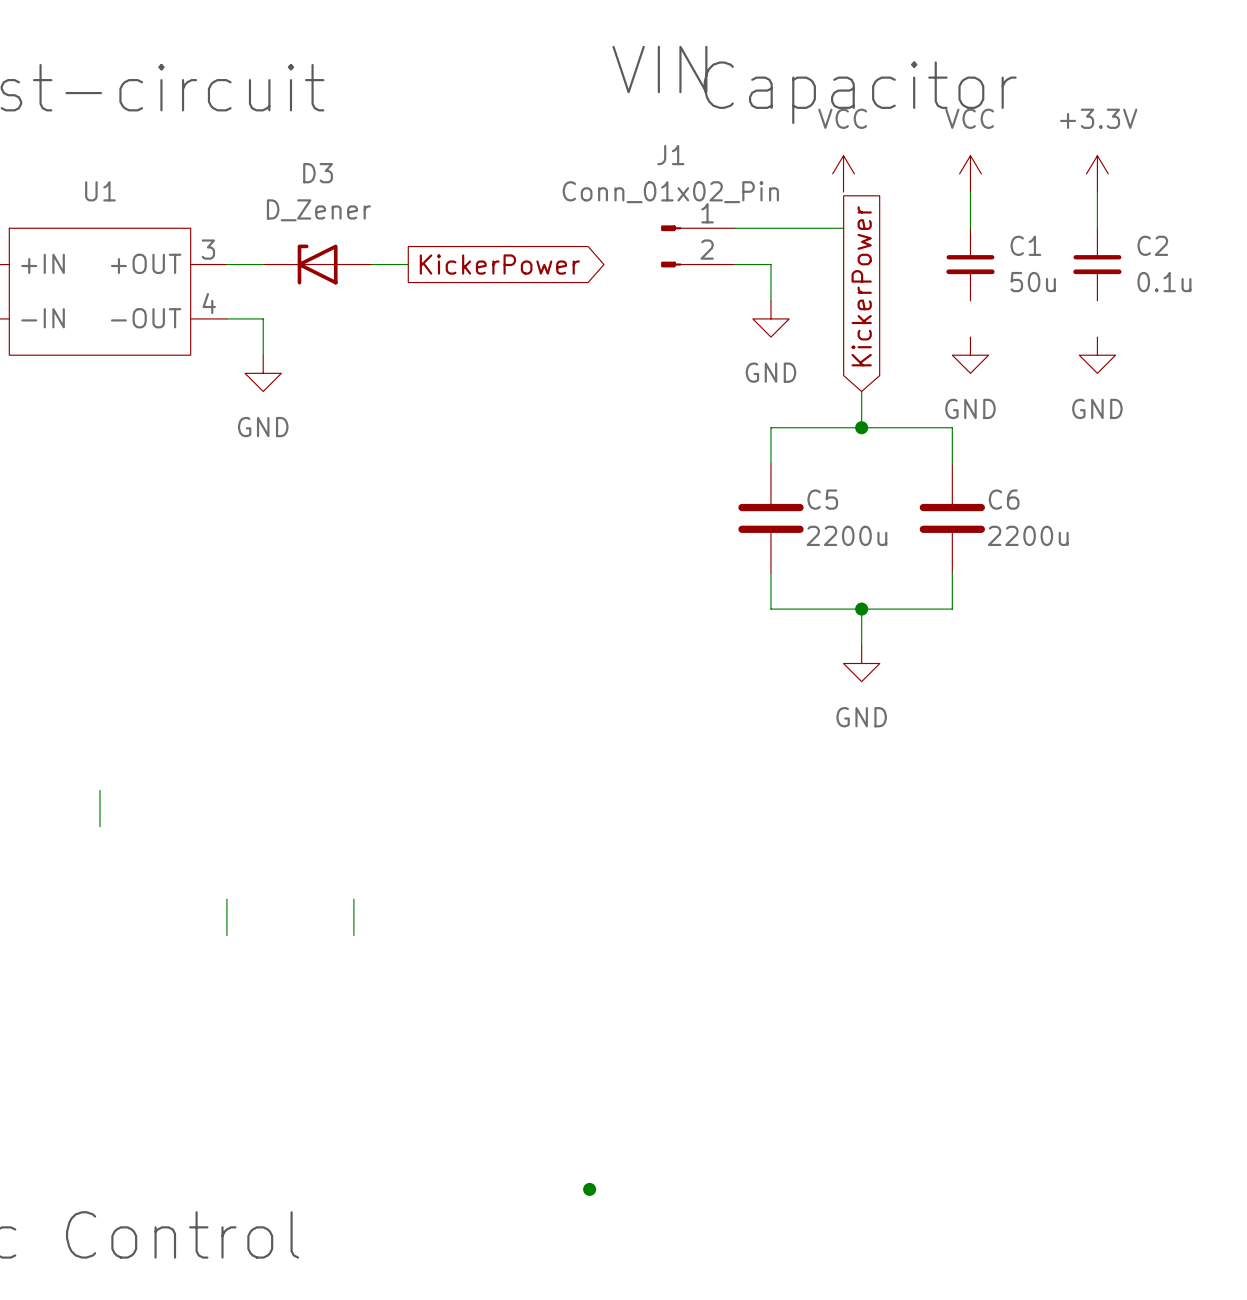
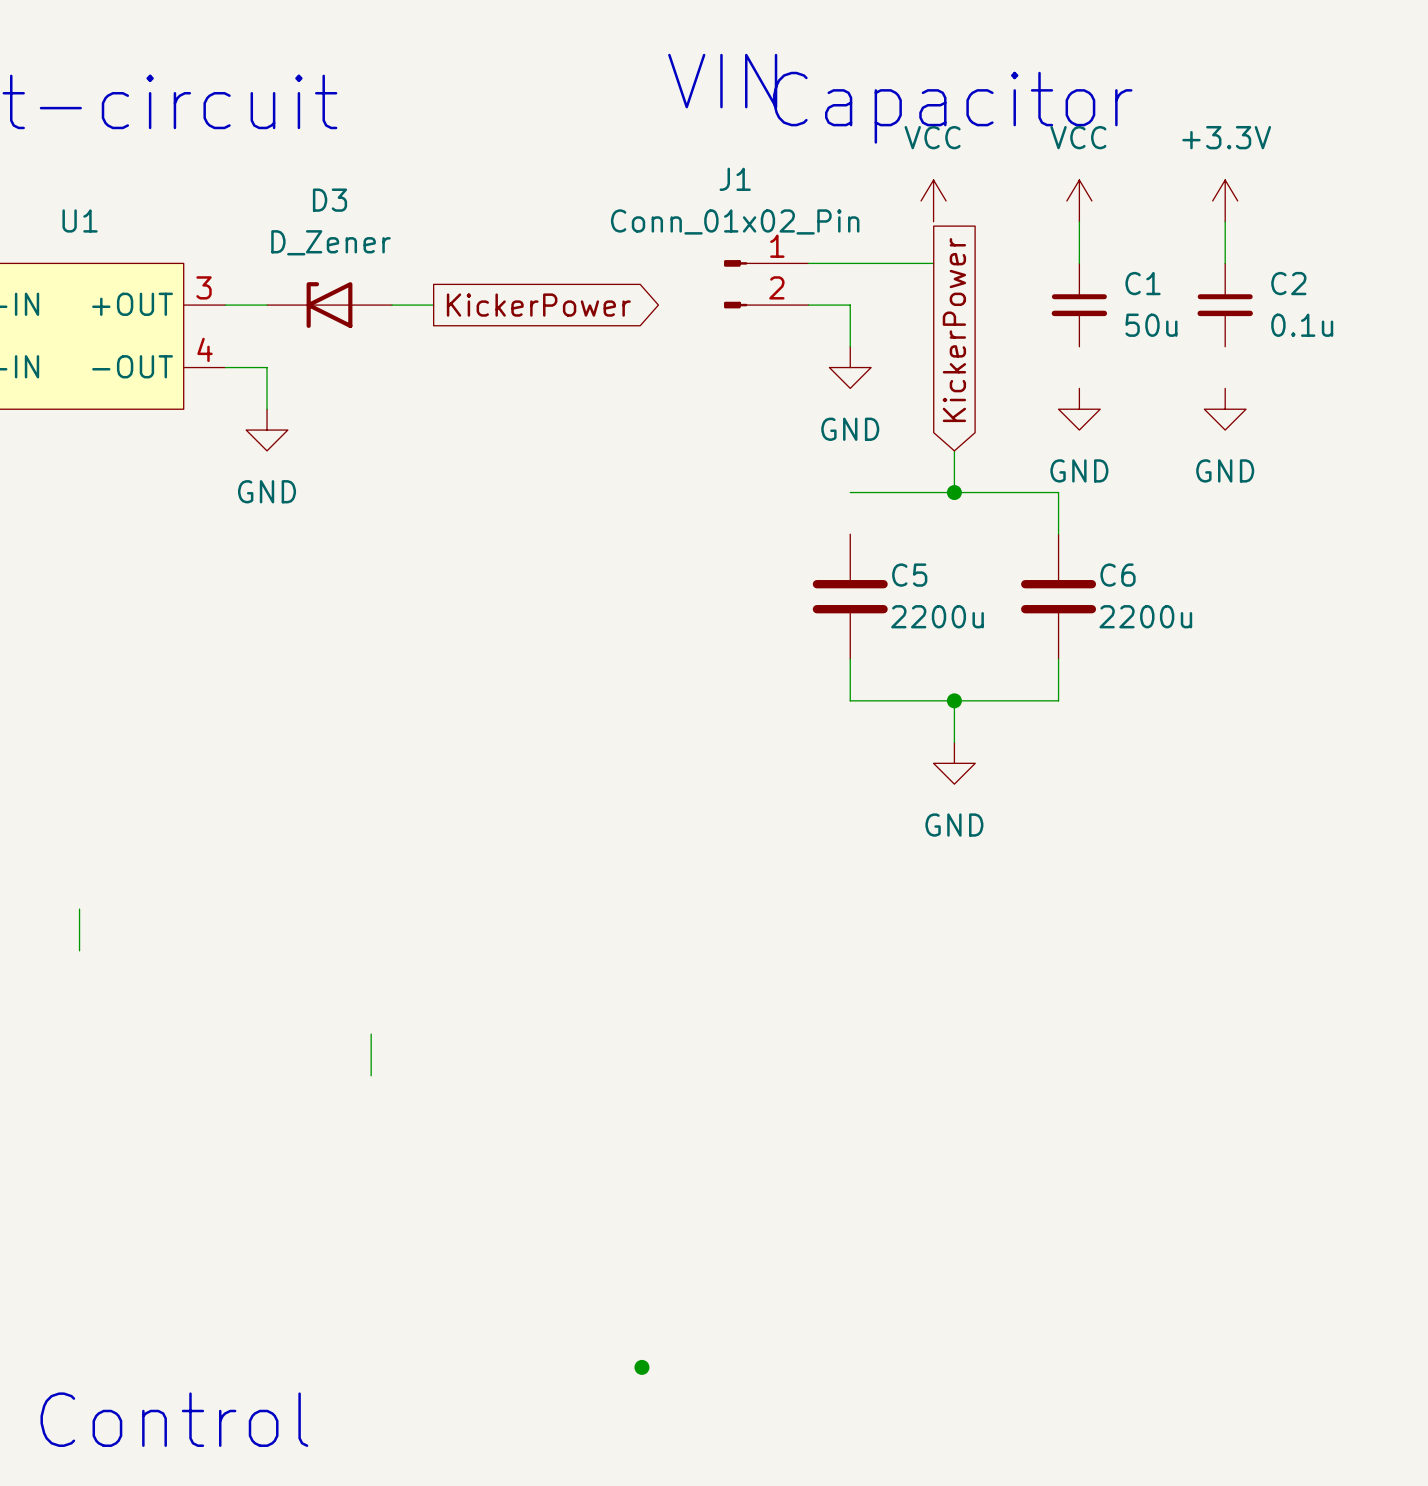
wire: (770, 427) (770, 464) -> none
wire: (226, 899) (226, 935) -> none

